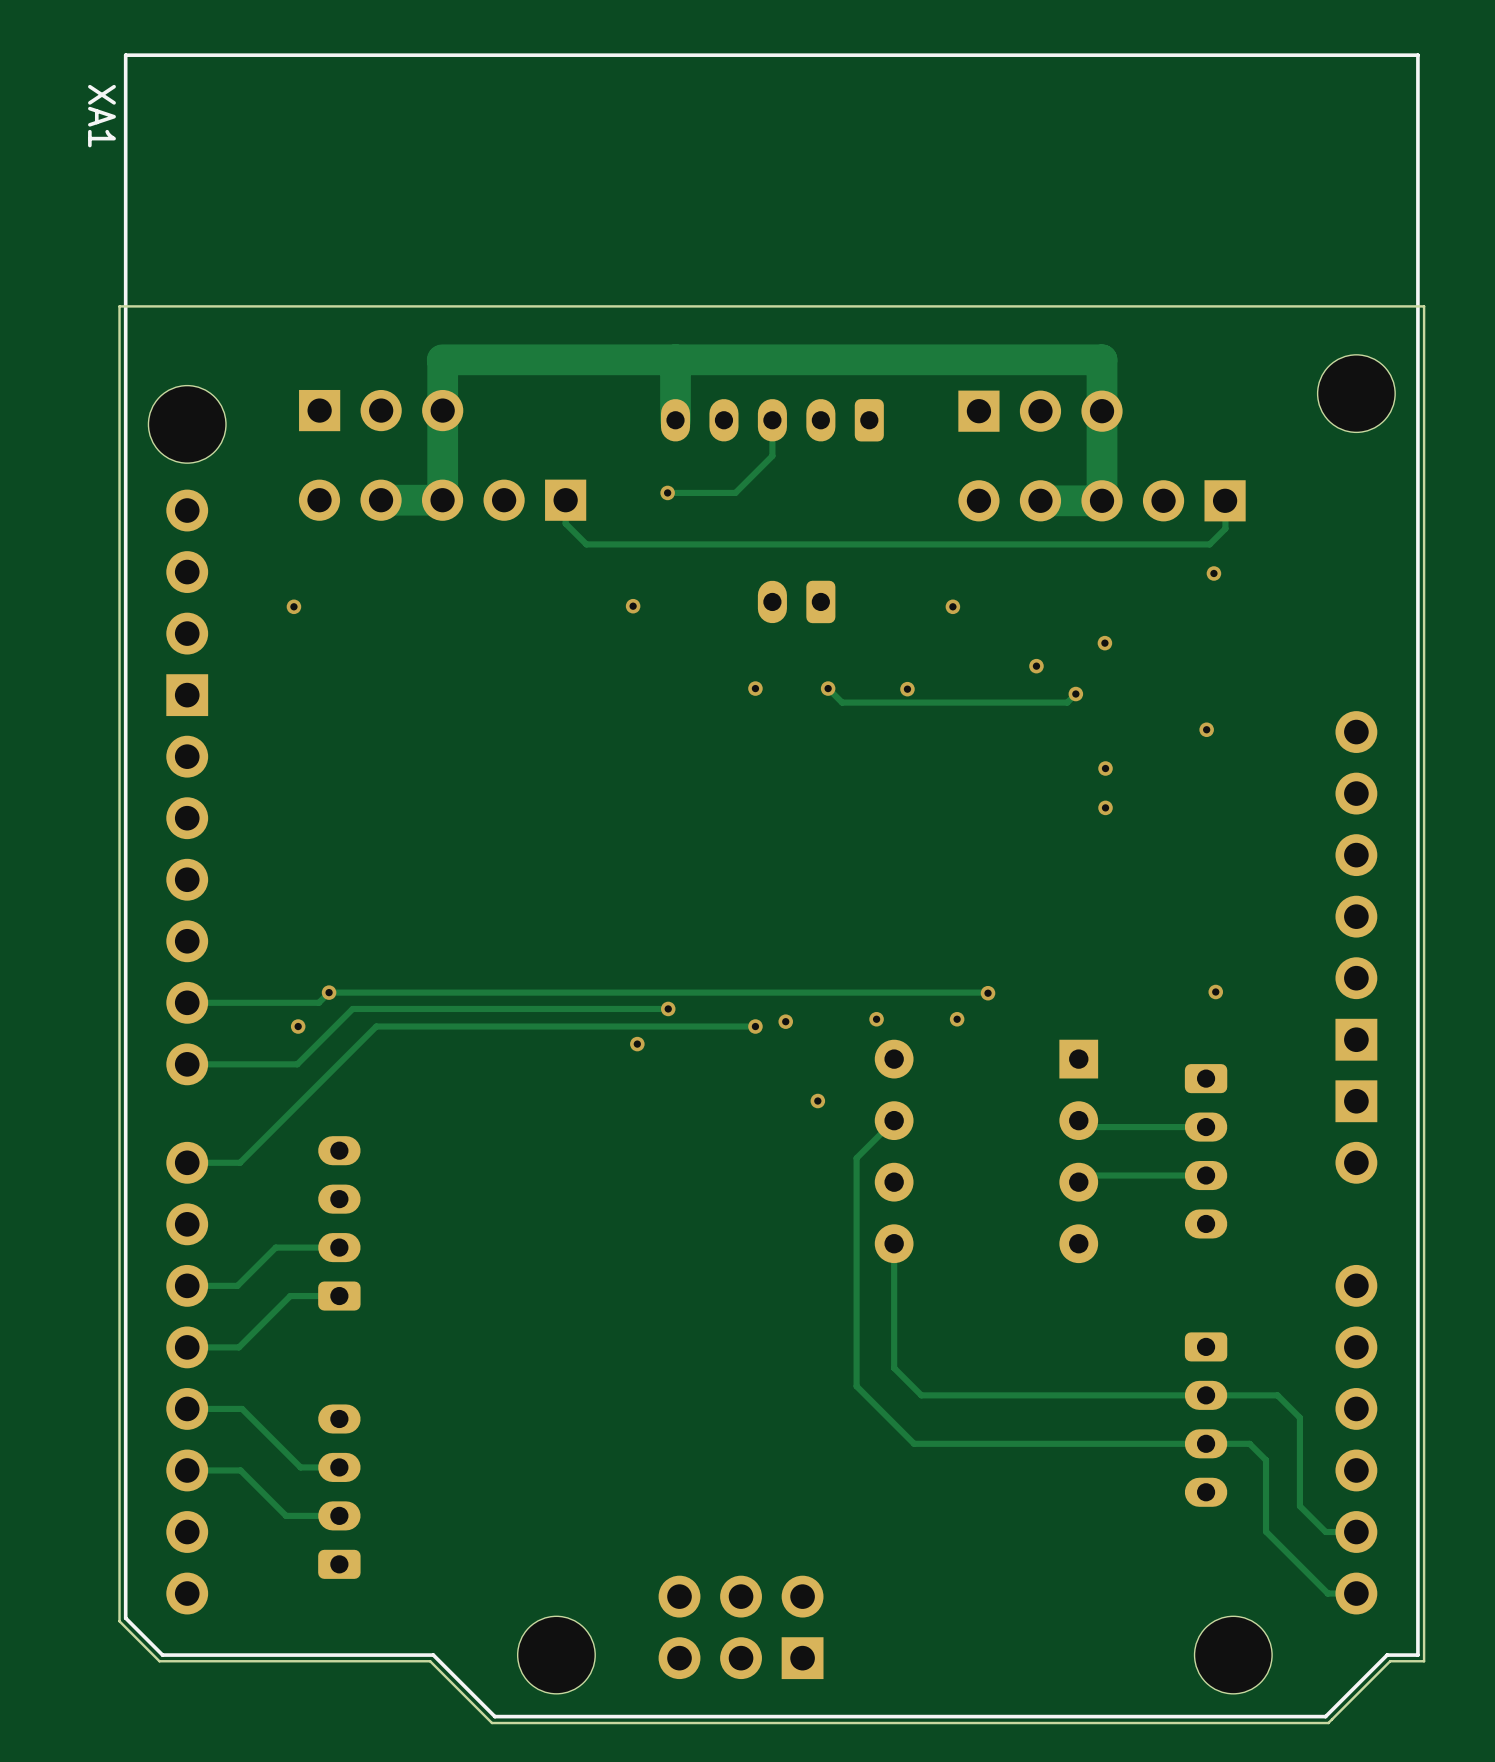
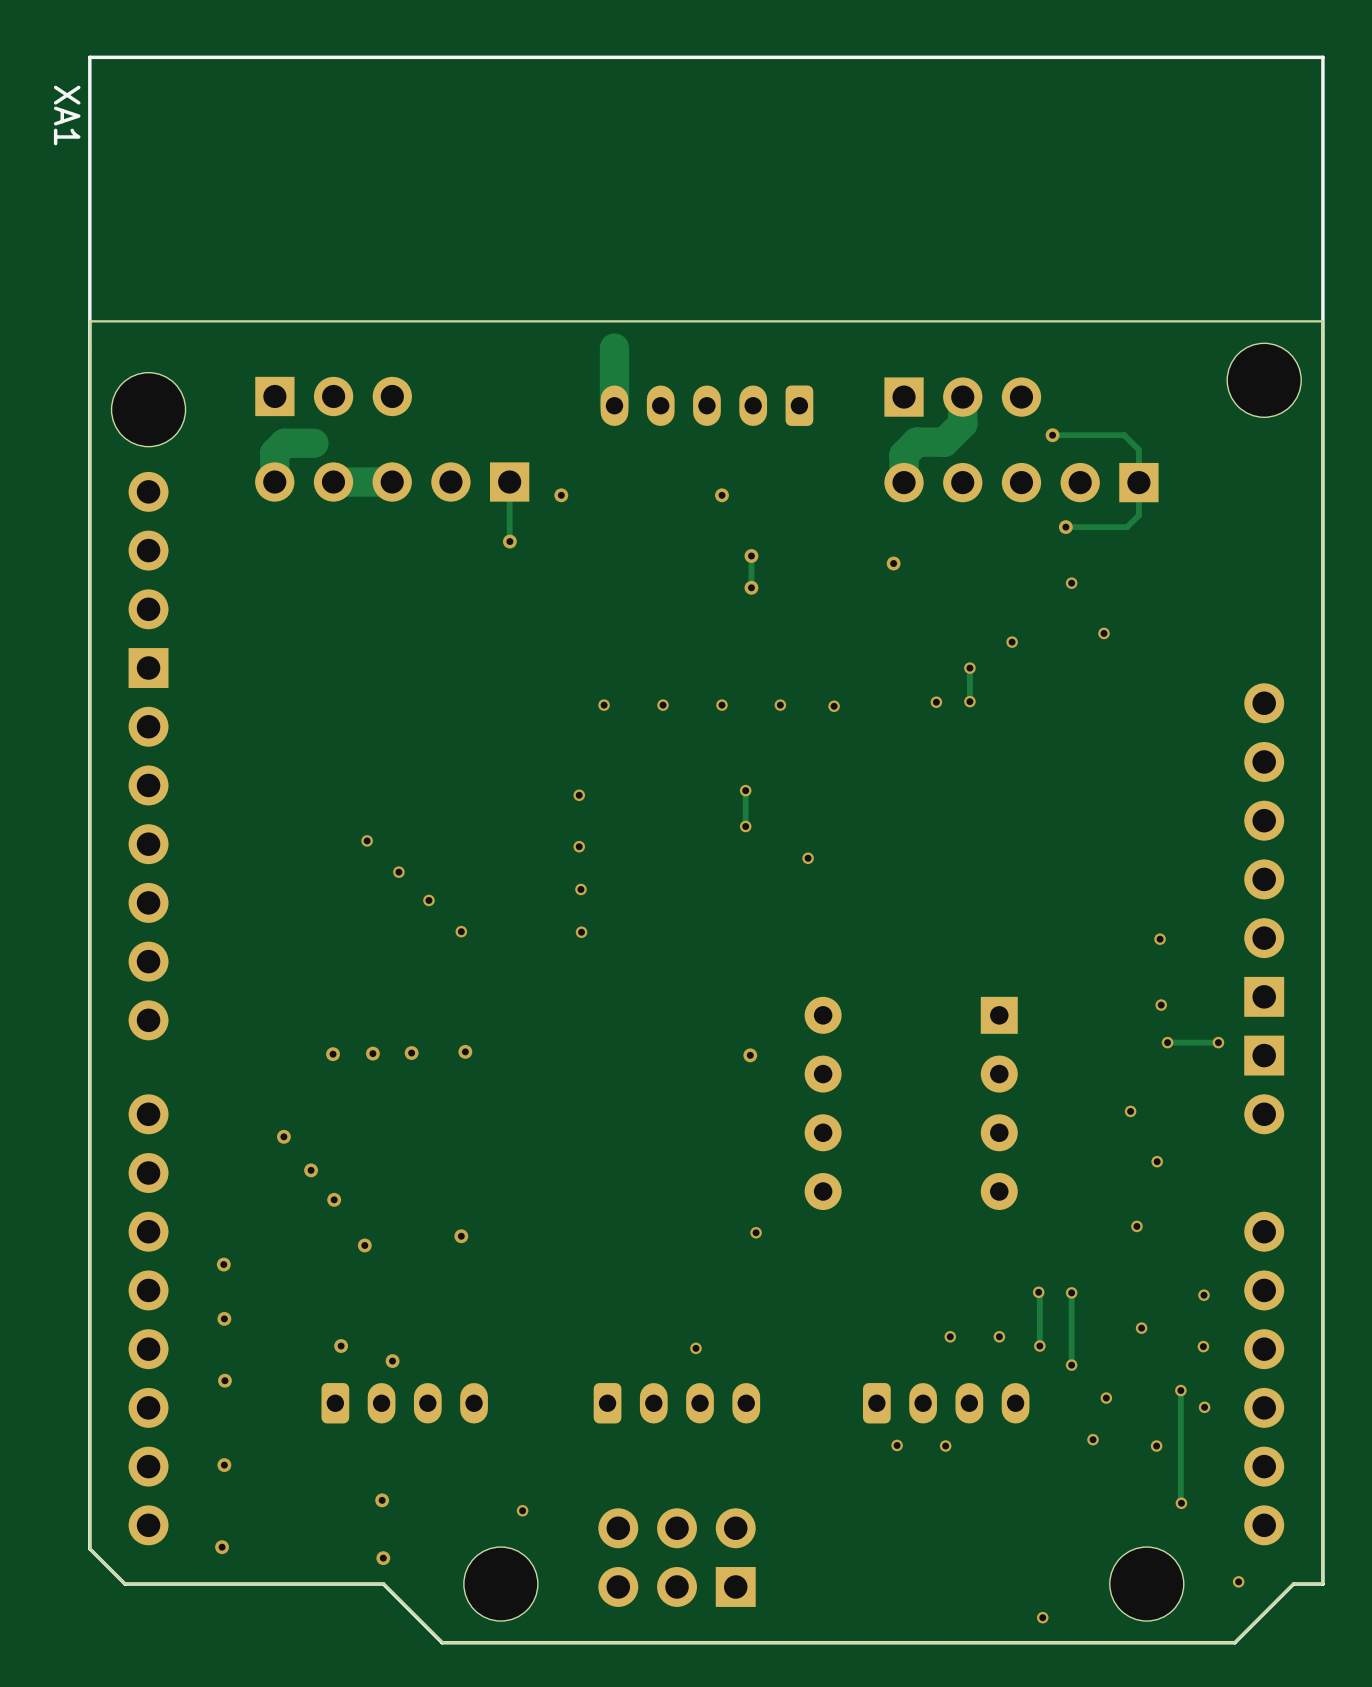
board edge: (1424, 306) (119, 306) (119, 1621) (159, 1661) (430, 1661) (491, 1723) (1328, 1723) (1390, 1661) (1424, 1661) (1424, 306) -> (1322, 321) (1322, 1583) (1293, 1583) (1234, 1642) (442, 1642) (383, 1583) (124, 1583) (90, 1548) (90, 321) (1322, 321)
track: (442, 359) (1102, 359) (1102, 500) (1040, 500) -> none
track: (442, 360) (442, 500) -> none
track: none -> (962, 397) (962, 423) (944, 442) (916, 442) (904, 454) (904, 482)
track: (772, 420) (772, 455) (735, 492) (667, 492) -> none
track: none -> (1052, 435) (1124, 435) (1138, 449) (1138, 515) (1127, 527) (1065, 527)
via: none -> (1052, 435)
track: none -> (313, 443) (284, 443) (274, 453) (274, 482)
via: (667, 492) -> none
track: (1225, 500) (1225, 528) (1209, 544) (586, 544) (565, 523) -> (509, 541) (509, 504)
via: none -> (561, 495)
via: none -> (721, 495)
via: none -> (1065, 527)
via: none -> (509, 541)
via: (1213, 573) -> none
track: none -> (751, 555) (751, 587)
via: none -> (751, 556)
part: (796, 601) -> none
via: (293, 606) -> none
via: (633, 606) -> none
via position: (952, 606) -> (893, 563)
via: none -> (1071, 583)
via: none -> (751, 587)
via: (1104, 643) -> none
via: none -> (1104, 633)
via: (1036, 666) -> none
via: none -> (1012, 642)
via: (755, 688) -> none
track: (828, 688) (842, 702) (1067, 702) (1075, 694) -> none
via: (828, 688) -> none
via: (907, 689) -> none
via: (1075, 694) -> none
track: none -> (969, 668) (969, 701)
via: none -> (969, 668)
via: (1206, 729) -> none
via: none -> (936, 702)
via: none -> (969, 701)
via: none -> (604, 705)
via: none -> (663, 705)
via: none -> (721, 705)
via: none -> (780, 705)
via: none -> (834, 706)
via: (1105, 768) -> none
via: (1105, 807) -> none
track: none -> (745, 790) (745, 826)
via: none -> (745, 790)
via: none -> (579, 795)
via: none -> (745, 826)
via: none -> (367, 840)
via: none -> (579, 846)
via: none -> (808, 858)
via: none -> (398, 872)
via: none -> (580, 889)
via: none -> (428, 900)
via: none -> (461, 931)
via: none -> (581, 932)
via: none -> (1160, 939)
via: (329, 992) -> none
via: (1215, 992) -> none
track: (988, 993) (329, 992) (318, 1002) (187, 1002) -> none
via: (988, 993) -> none
track: (668, 1008) (352, 1008) (297, 1064) (187, 1064) -> none
via: (668, 1008) -> none
via: (876, 1019) -> none
via: (957, 1019) -> none
via: (785, 1021) -> none
via: (298, 1026) -> none
track: (755, 1026) (376, 1026) (240, 1162) (187, 1162) -> none
via: (755, 1026) -> none
via: (637, 1044) -> none
via: none -> (1161, 1005)
via: none -> (1167, 1042)
track: none -> (1218, 1042) (1167, 1042)
via: none -> (1218, 1042)
via: none -> (465, 1051)
via: none -> (411, 1053)
via: none -> (333, 1054)
via: none -> (372, 1053)
track: (894, 1120) (856, 1158) (856, 1386) (914, 1443) (1249, 1443) (1266, 1460) (1266, 1531) (1327, 1593) (1356, 1593) -> none
track: (1078, 1120) (1085, 1127) (1206, 1127) -> none
part: (1206, 1151) -> none
via: none -> (1130, 1111)
track: (1206, 1175) (1085, 1175) (1078, 1182) -> none
via: none -> (283, 1136)
via: none -> (1157, 1161)
via: none -> (311, 1170)
part: (339, 1223) -> none
track: (894, 1243) (894, 1368) (921, 1395) (1277, 1395) (1299, 1417) (1299, 1506) (1325, 1532) (1356, 1532) -> none
track: (339, 1247) (275, 1247) (237, 1285) (187, 1285) -> none
via: none -> (334, 1199)
via: none -> (1136, 1226)
via: none -> (756, 1232)
via: none -> (461, 1236)
track: (339, 1296) (290, 1296) (238, 1347) (187, 1347) -> none
via: none -> (364, 1245)
via: none -> (223, 1264)
track: none -> (1038, 1292) (1039, 1346)
via: none -> (1038, 1292)
track: none -> (1071, 1292) (1071, 1365)
via: none -> (1071, 1292)
via: none -> (1203, 1295)
via: none -> (224, 1318)
via: none -> (1141, 1328)
via: none -> (950, 1336)
via: none -> (999, 1336)
via: none -> (341, 1346)
via: none -> (1039, 1346)
via: none -> (1203, 1346)
track: (187, 1408) (242, 1408) (300, 1467) (339, 1467) -> none
via: none -> (695, 1348)
part: (1206, 1419) -> none
via: none -> (392, 1361)
via: none -> (1071, 1365)
via: none -> (224, 1380)
track: none -> (1180, 1390) (1181, 1503)
via: none -> (1180, 1390)
via: none -> (1106, 1398)
part: none -> (676, 1403)
part: none -> (946, 1403)
via: none -> (1204, 1407)
track: (187, 1470) (240, 1470) (286, 1515) (339, 1515) -> none
part rotation: 0° (339, 1491) -> 90° clockwise (404, 1403)
part position: (339, 1491) -> (404, 1403)
via: none -> (1093, 1439)
via: none -> (897, 1445)
via: none -> (945, 1446)
via: none -> (1156, 1446)
via: none -> (224, 1465)
via: none -> (382, 1500)
via: none -> (1181, 1503)
via: none -> (522, 1510)
via: none -> (222, 1547)
via: none -> (383, 1558)
via: none -> (1238, 1581)
via: none -> (1042, 1617)

